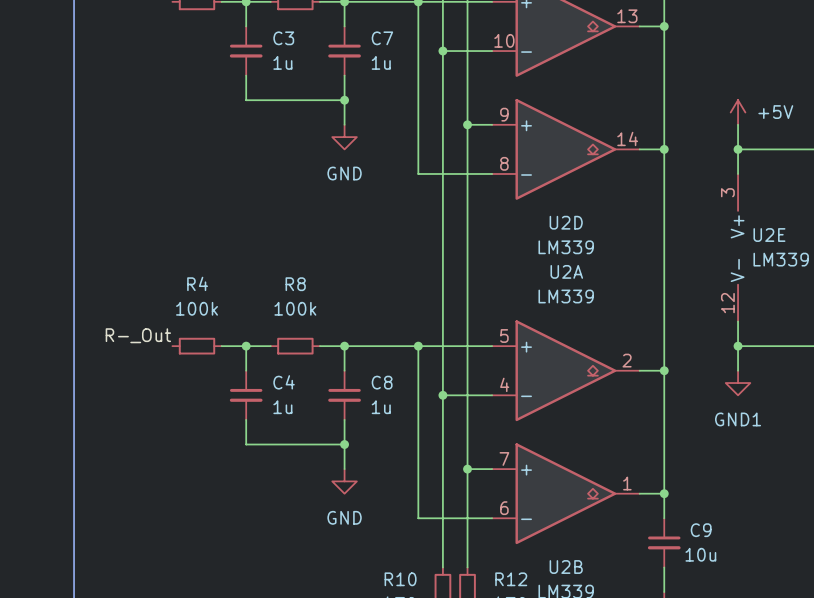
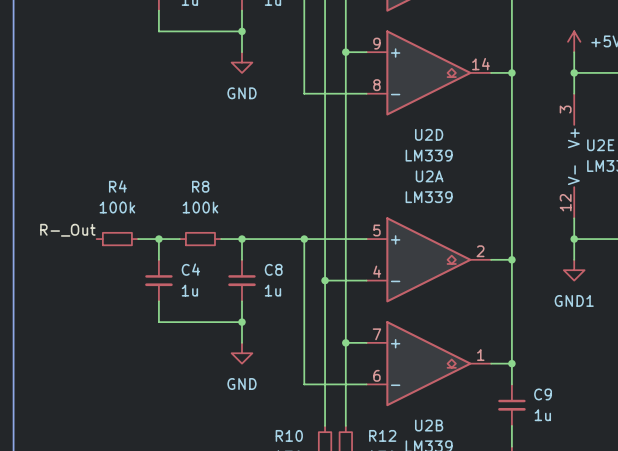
C9 value: 10u (700, 554) -> 1u (542, 415)

